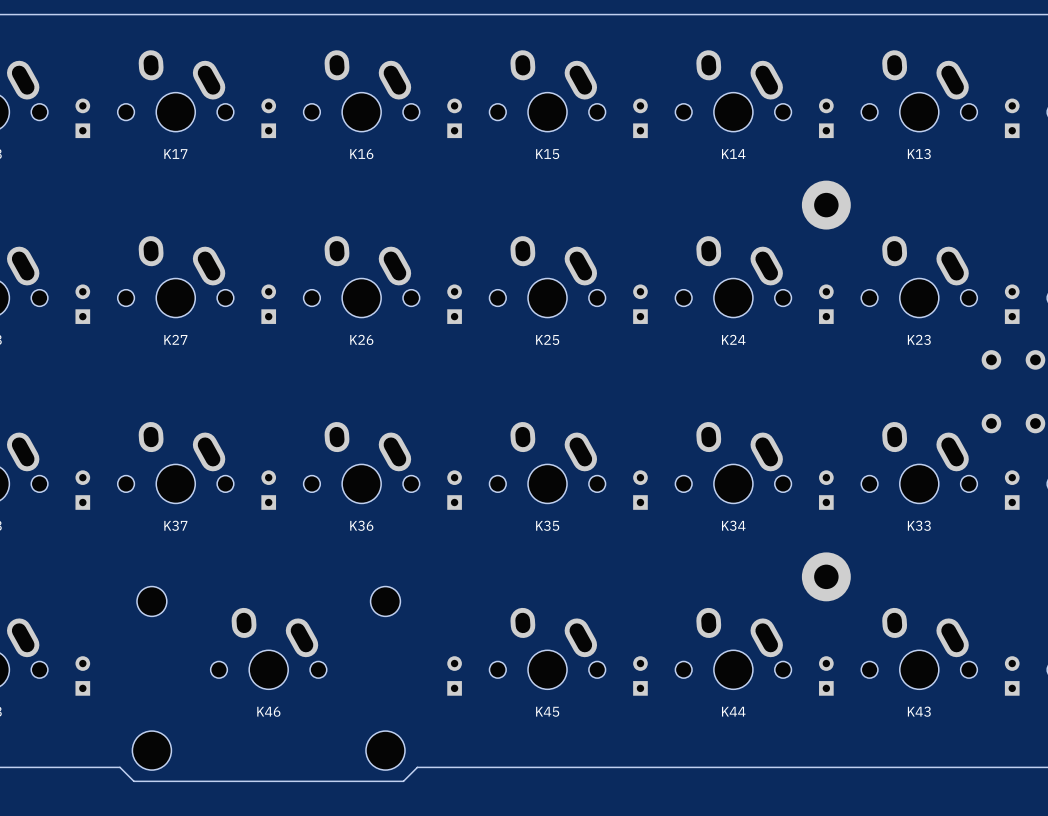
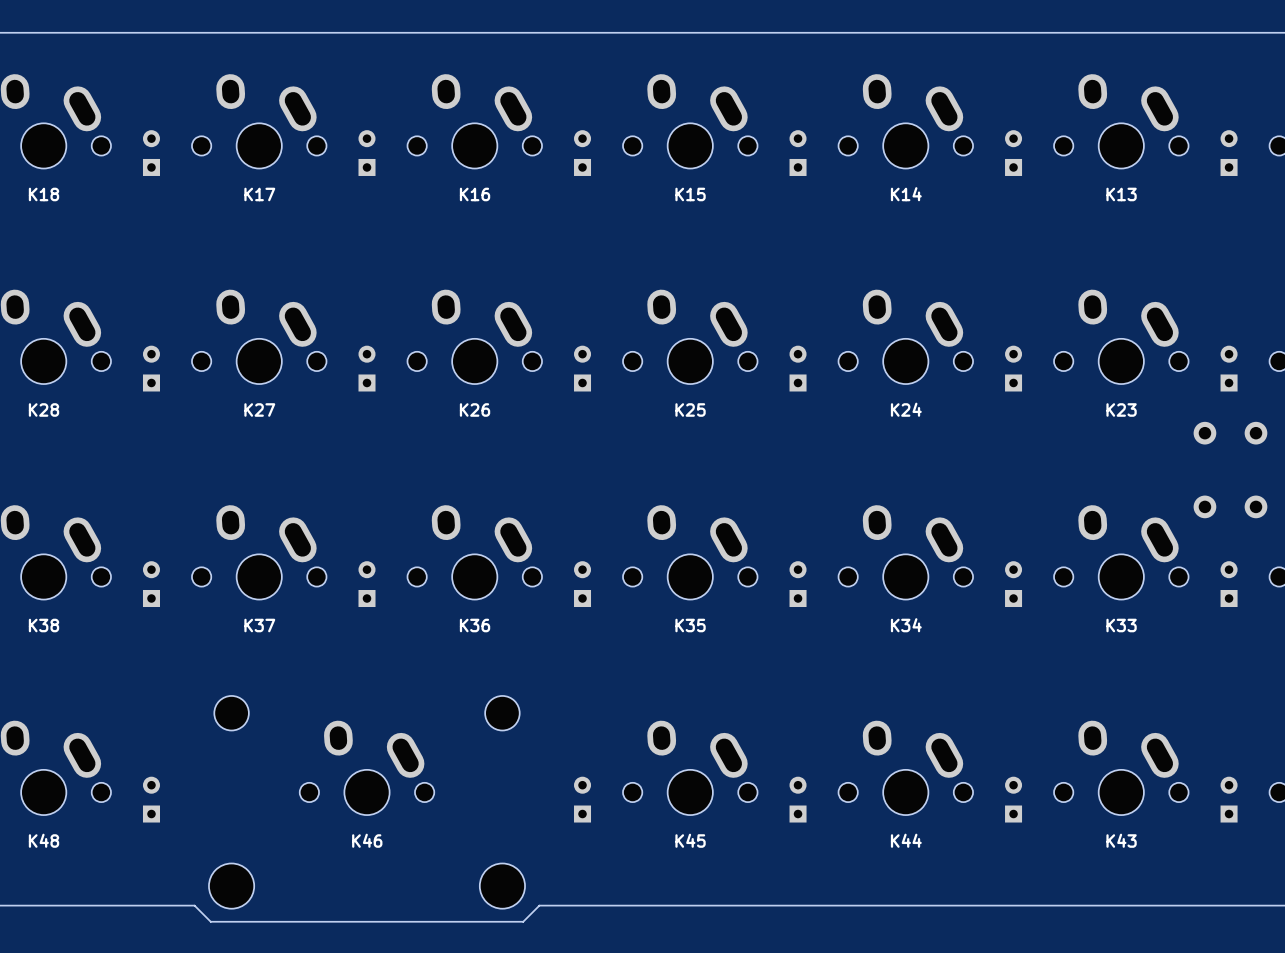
part: (826, 205) -> none
part: (826, 576) -> none

